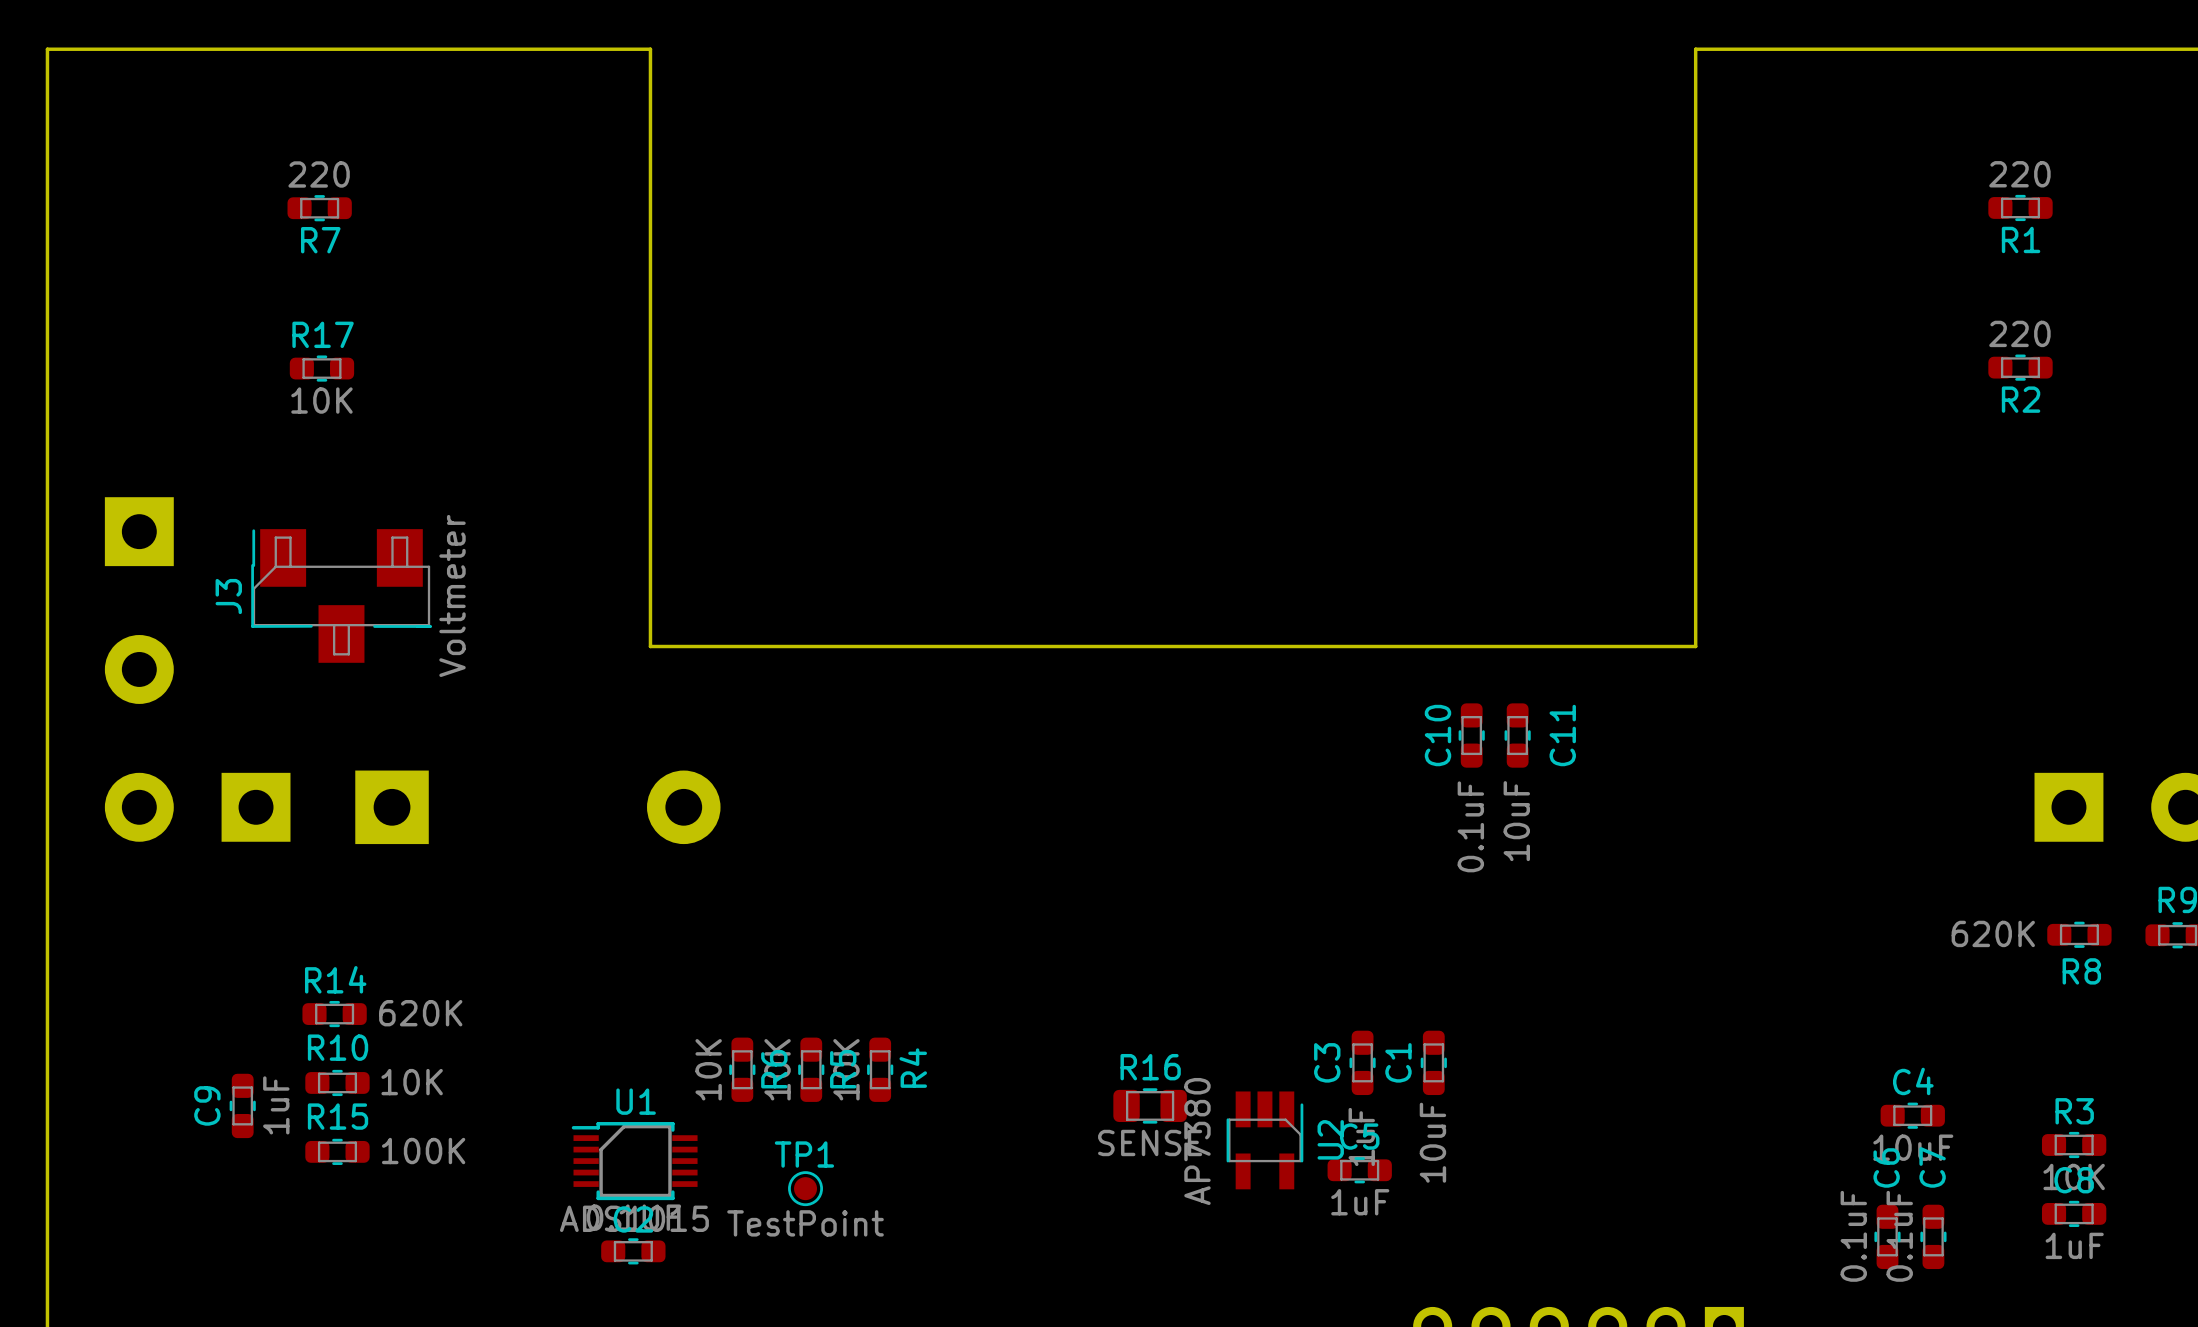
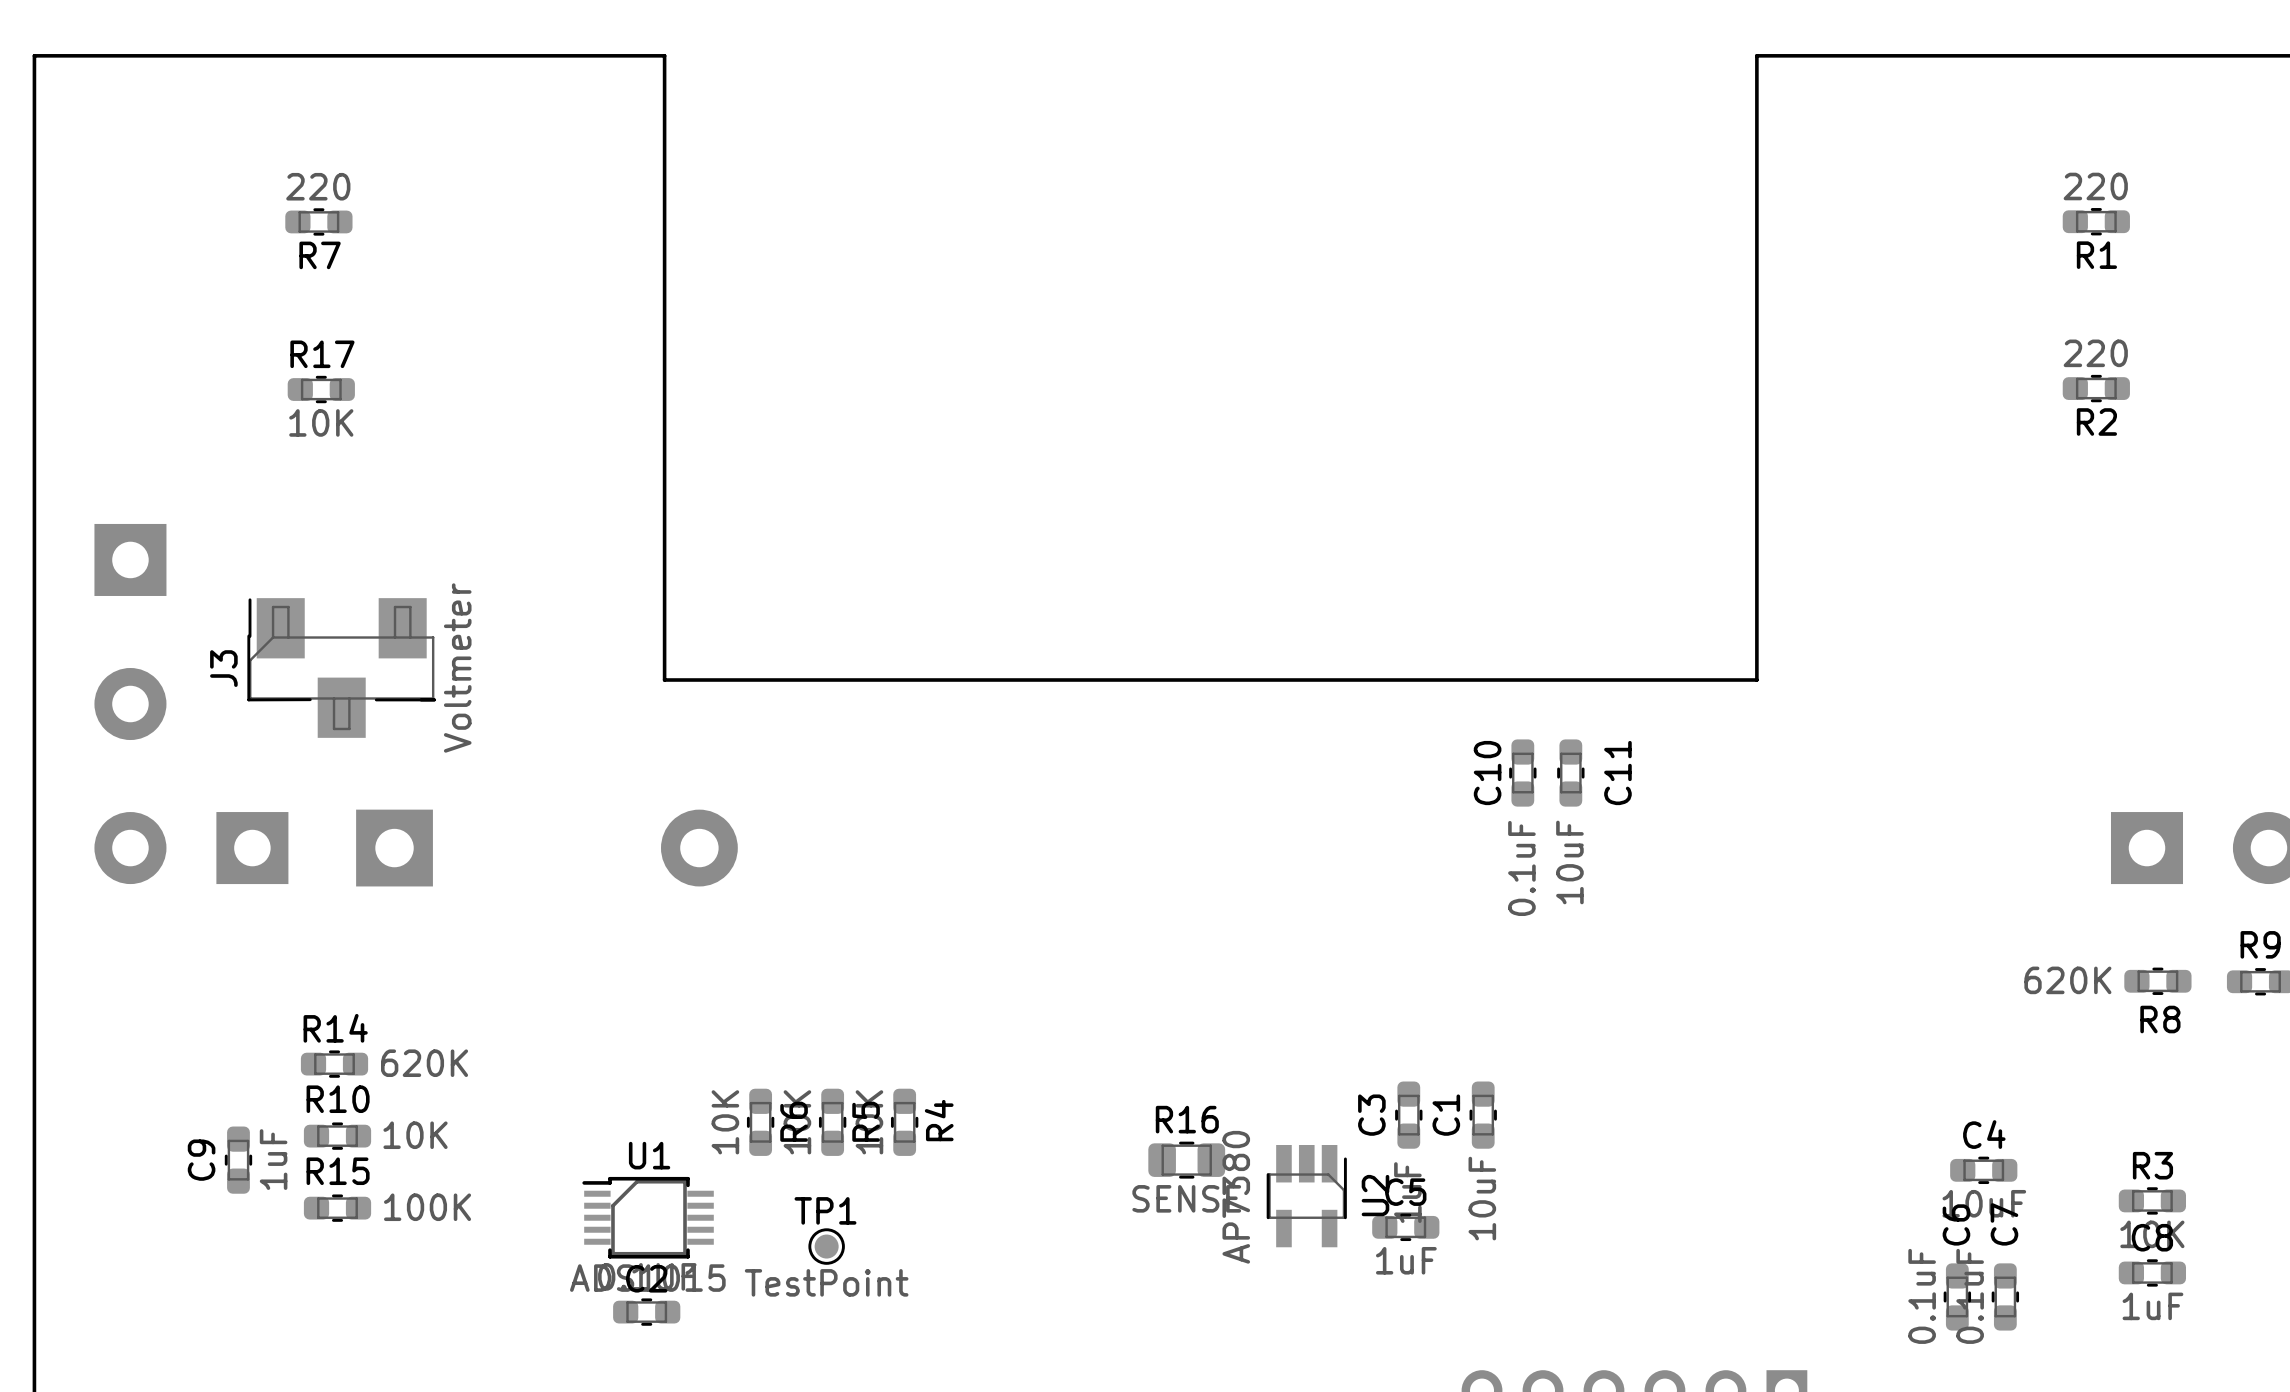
J3 position: (341, 595) -> (341, 667)

